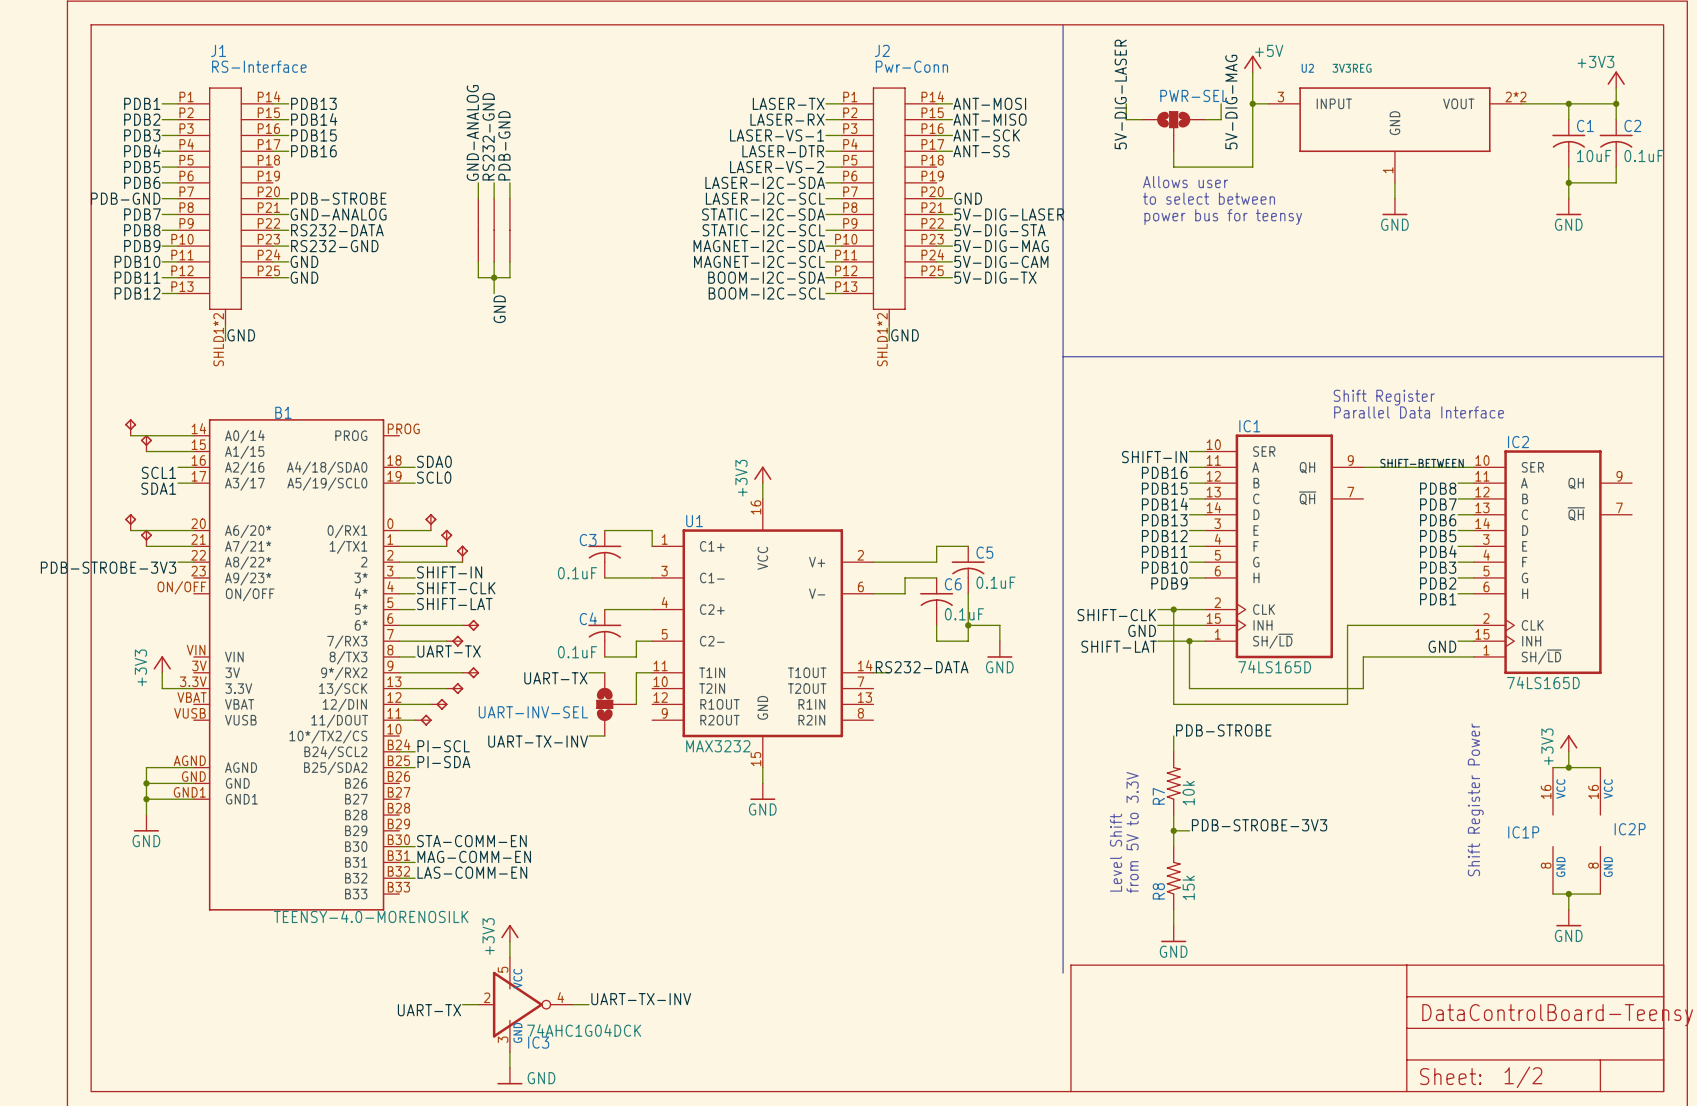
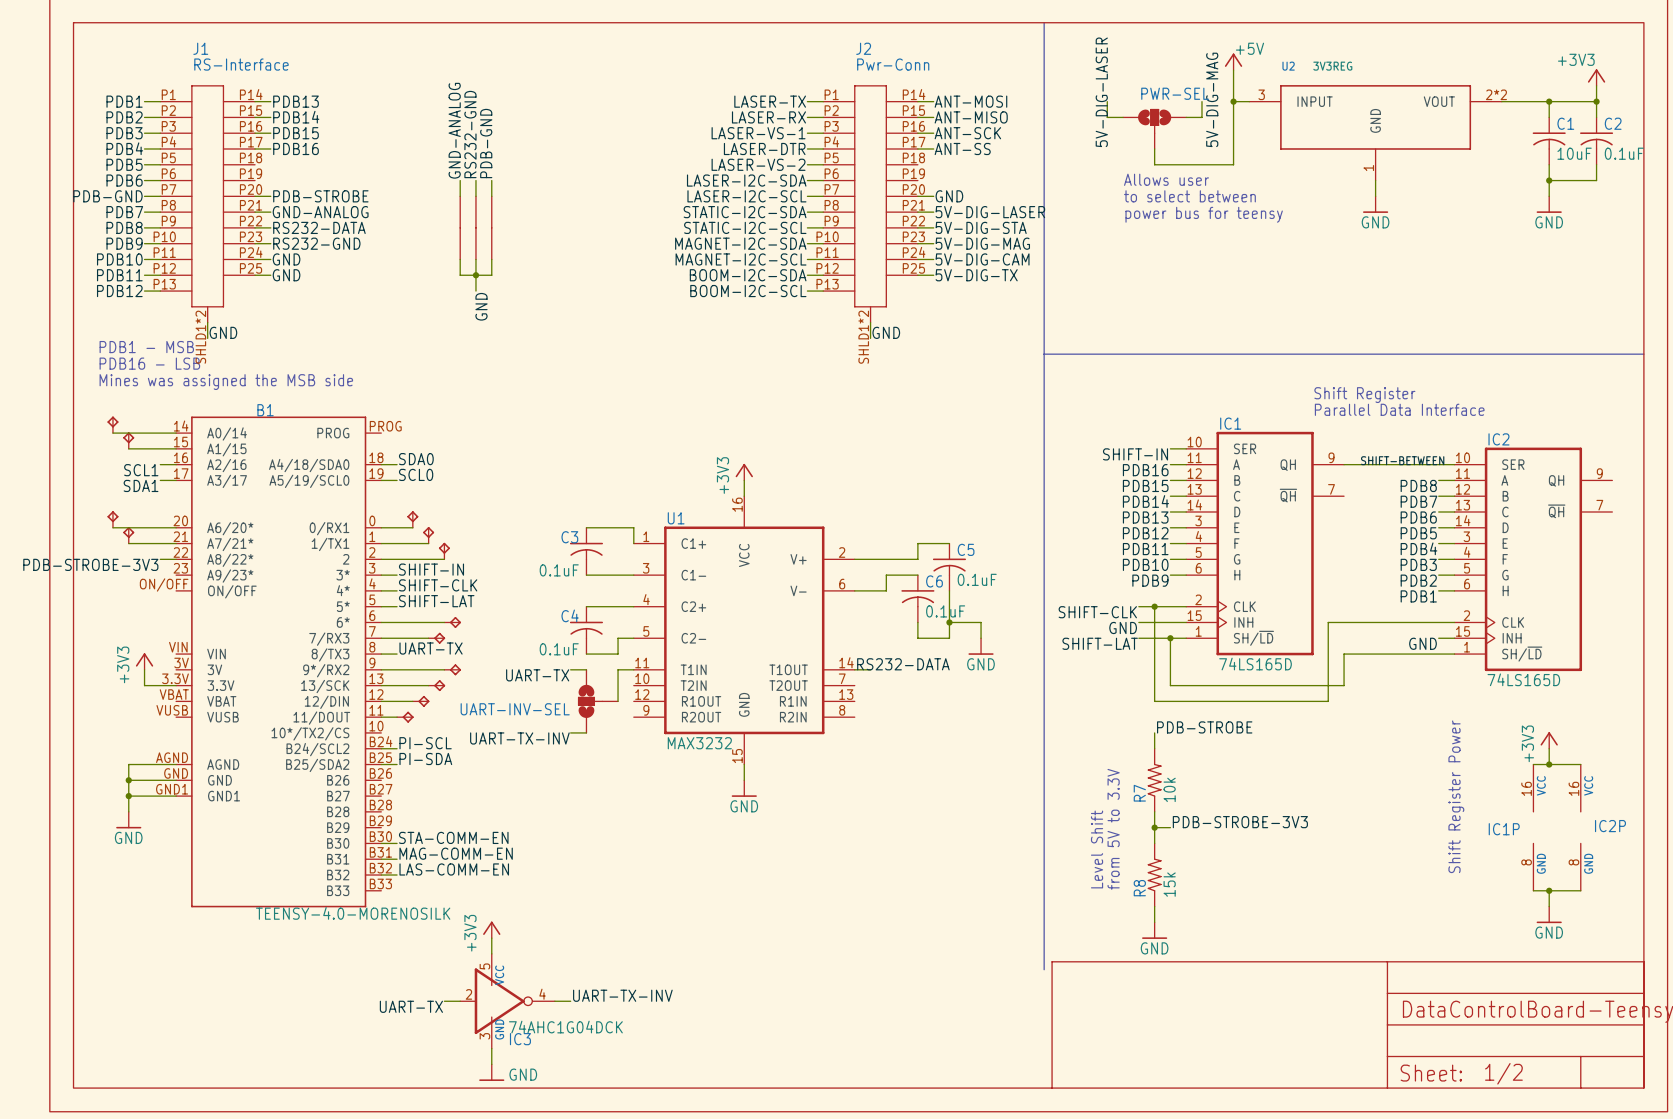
text: none -> PDB1 - MSB (146, 347)
text: none -> PDB16 - LSB (149, 363)
text: none -> Mines was assigned the MSB side (226, 382)

